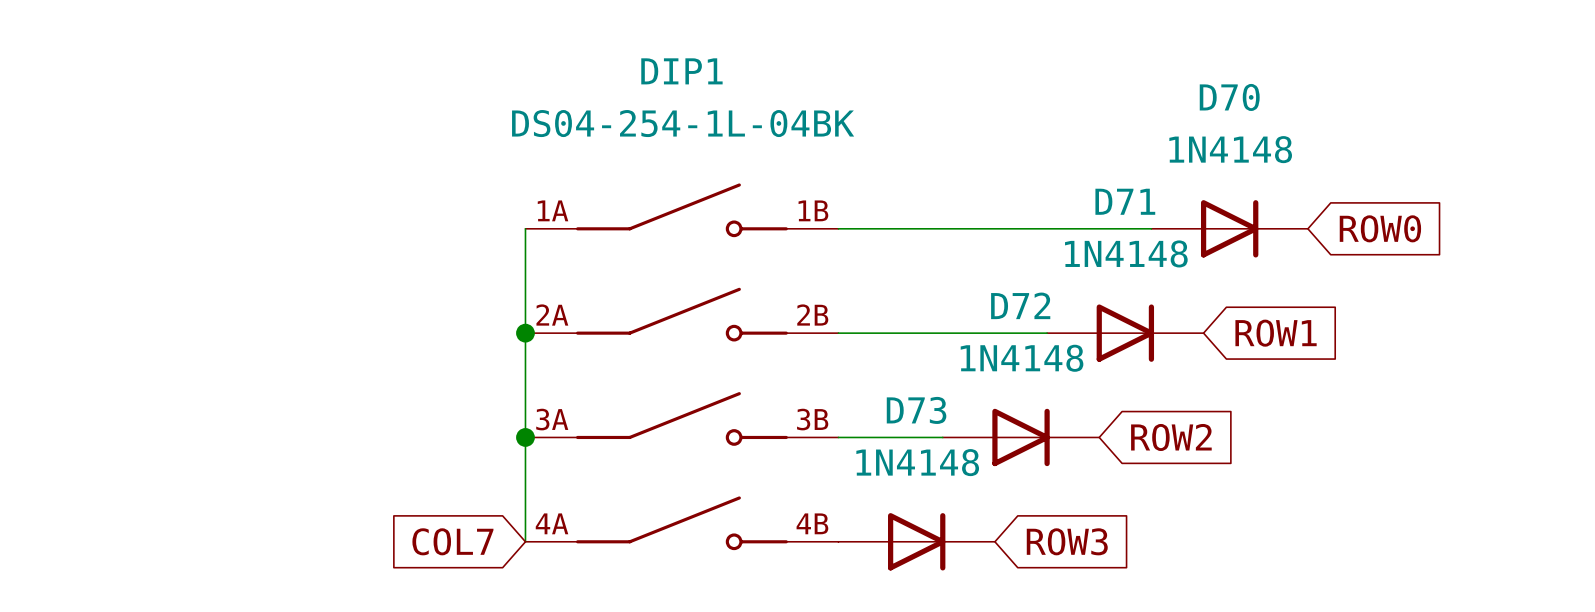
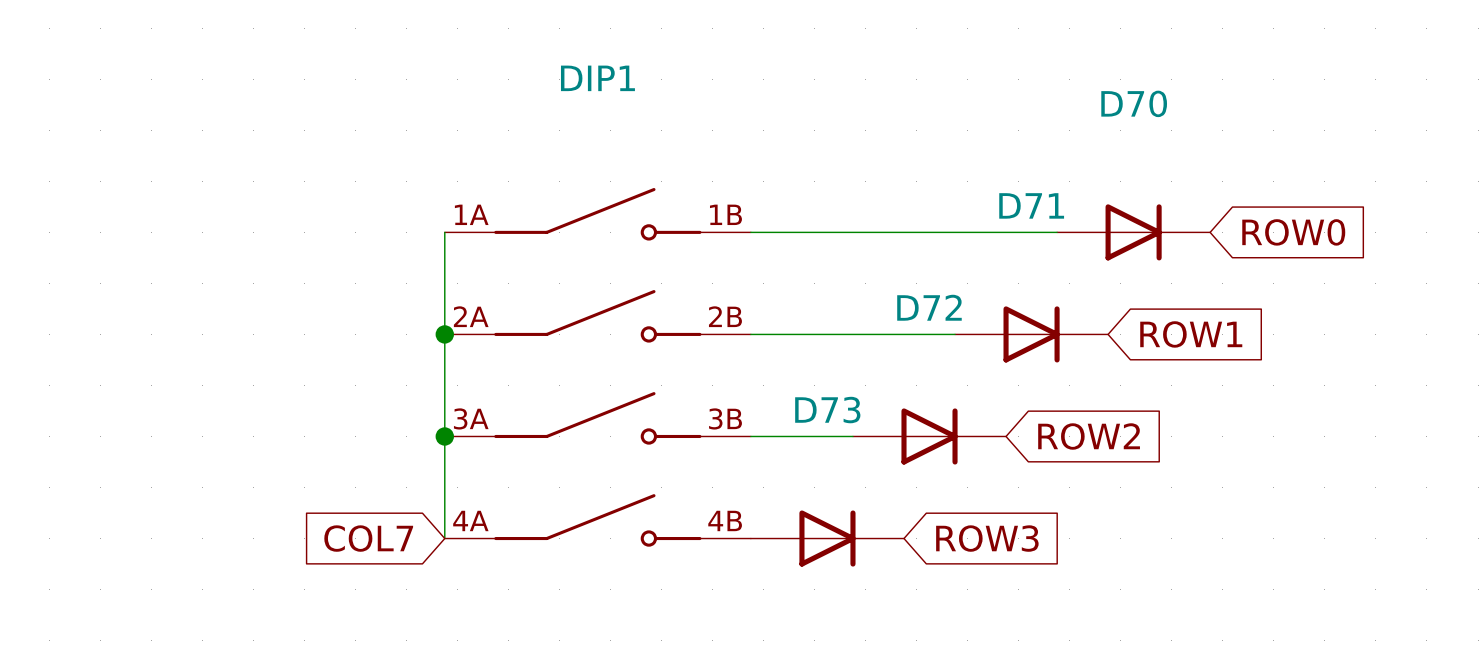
DIP1 value: DS04-254-1L-04BK (683, 123) -> none
D70 value: 1N4148 (1230, 149) -> none
D71 value: 1N4148 (1126, 253) -> none
D72 value: 1N4148 (1022, 358) -> none
D73 value: 1N4148 (917, 462) -> none

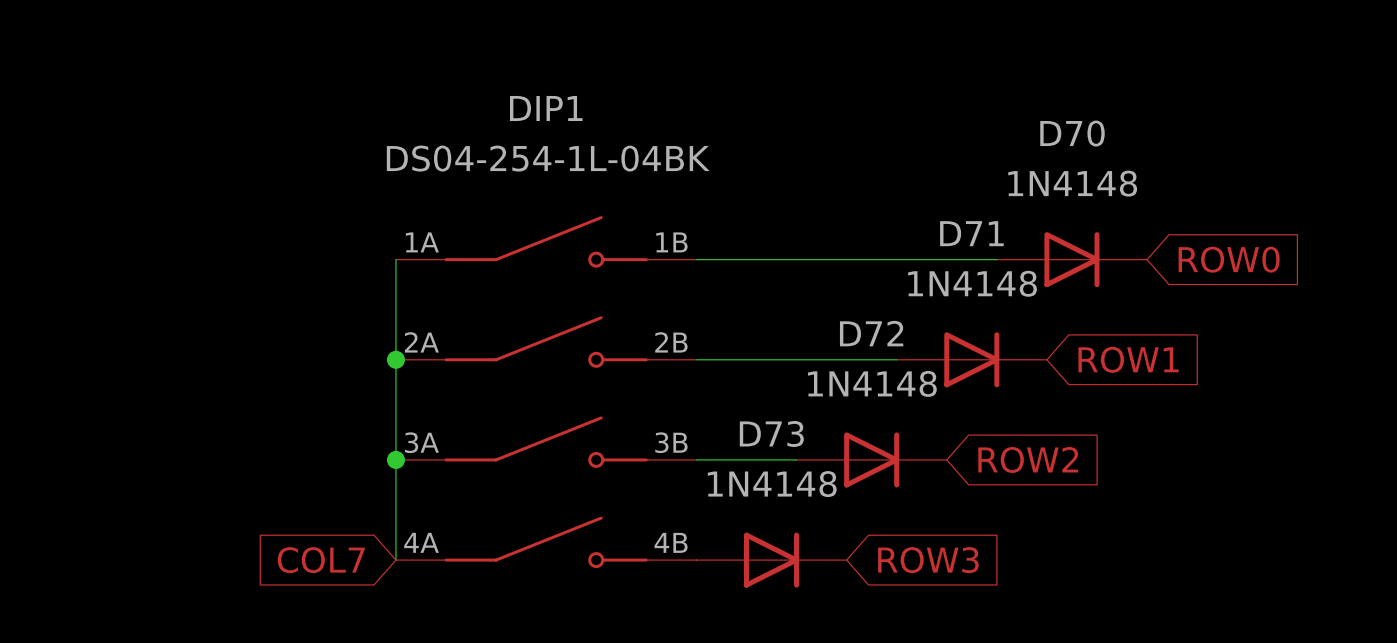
DIP1 value: none -> DS04-254-1L-04BK (548, 158)
D70 value: none -> 1N4148 (1072, 183)
D71 value: none -> 1N4148 (972, 283)
D72 value: none -> 1N4148 (872, 383)
D73 value: none -> 1N4148 (772, 484)

